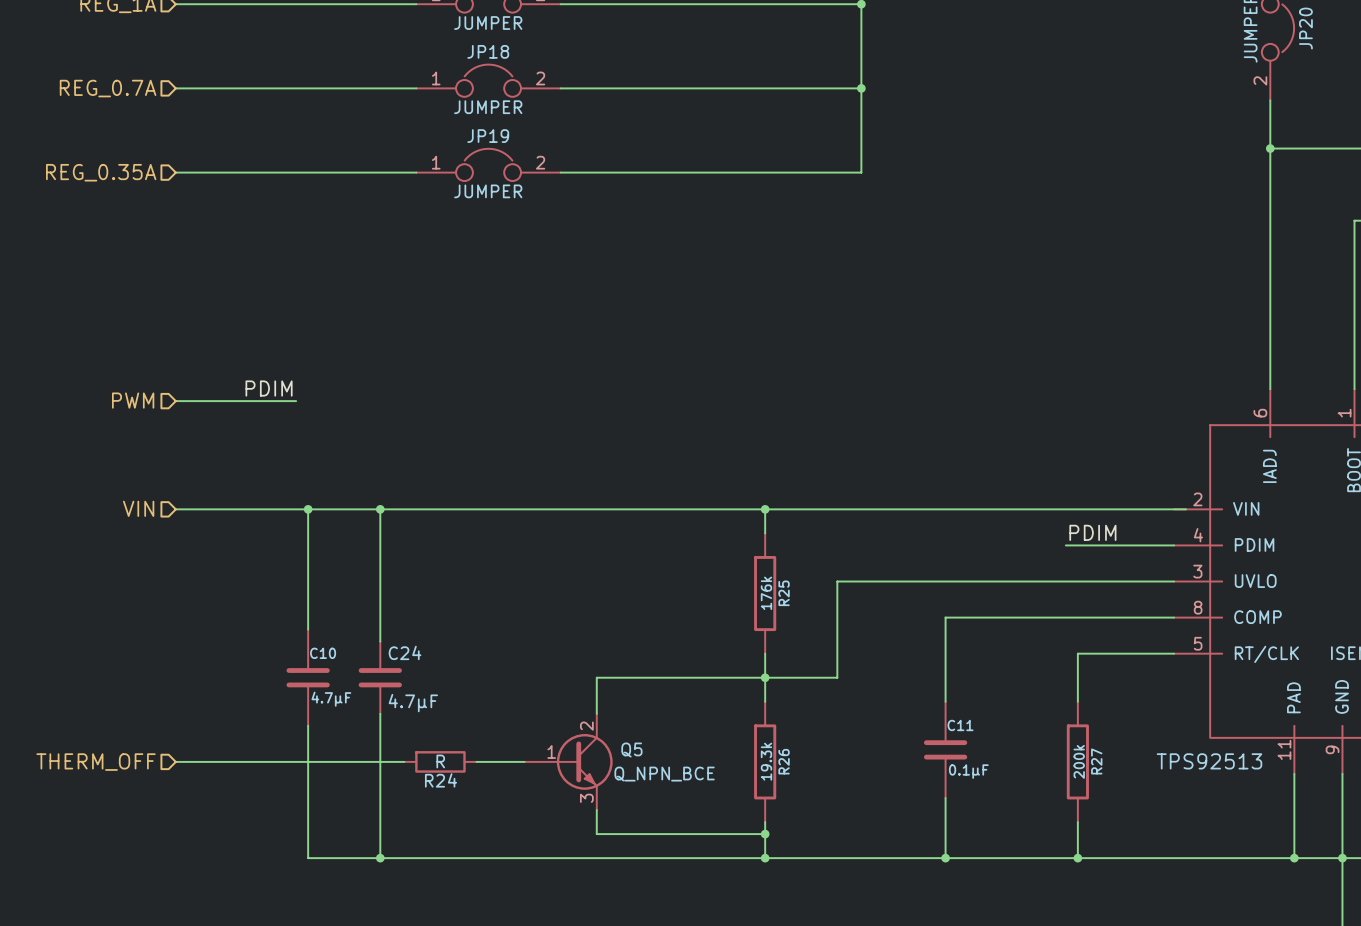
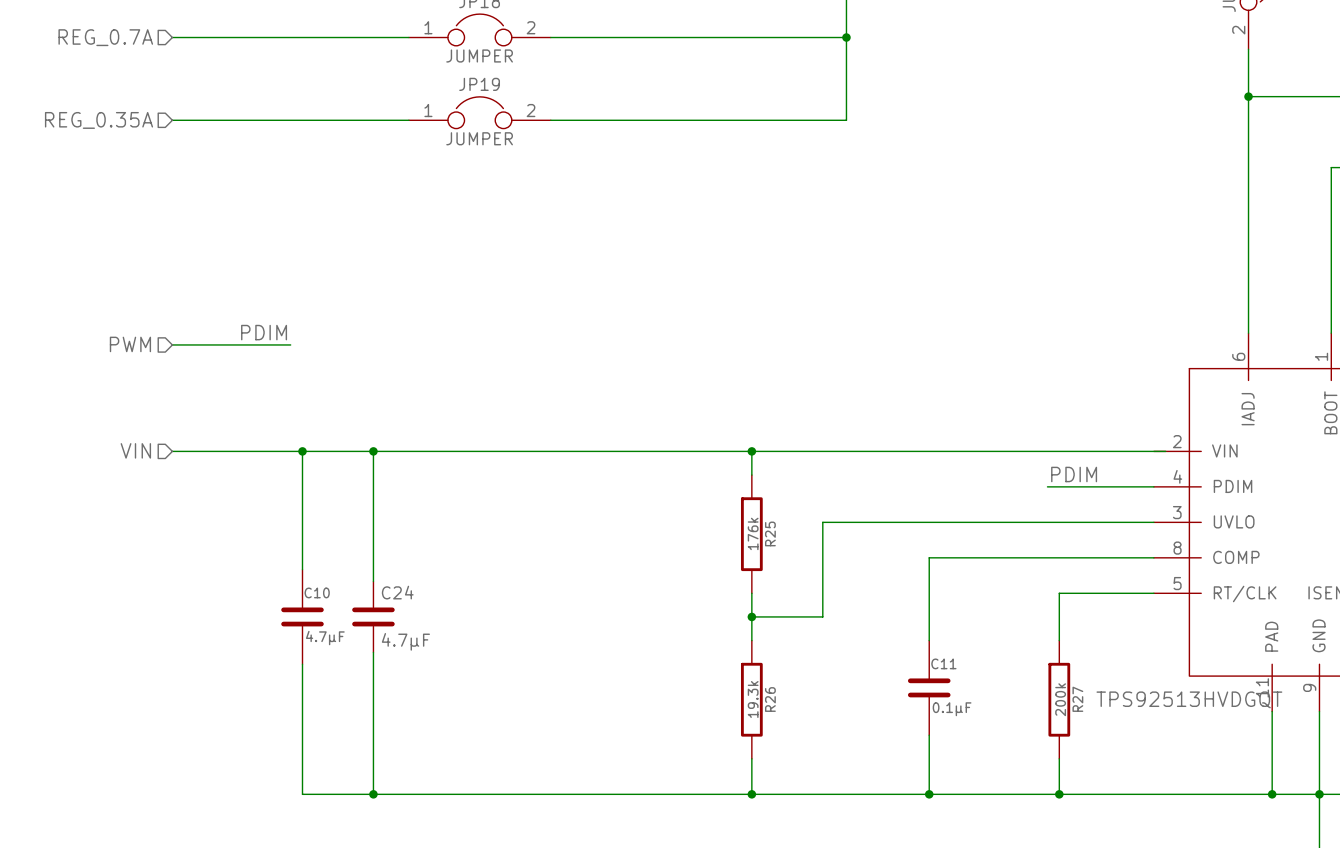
wire: (765, 677) (596, 677) (596, 713) -> none
wire: (175, 761) (404, 761) -> none
R24: R (440, 761) -> none
wire: (476, 761) (524, 761) -> none
Q5: Q_NPN_BCE (568, 761) -> none
part value: TPS92513 (1209, 761) -> TPS92513HVDGQT (1189, 699)
hierarchical label: THERM_OFF (96, 762) -> none
wire: (596, 810) (596, 834) (765, 834) -> none
junction: (765, 834) -> none

